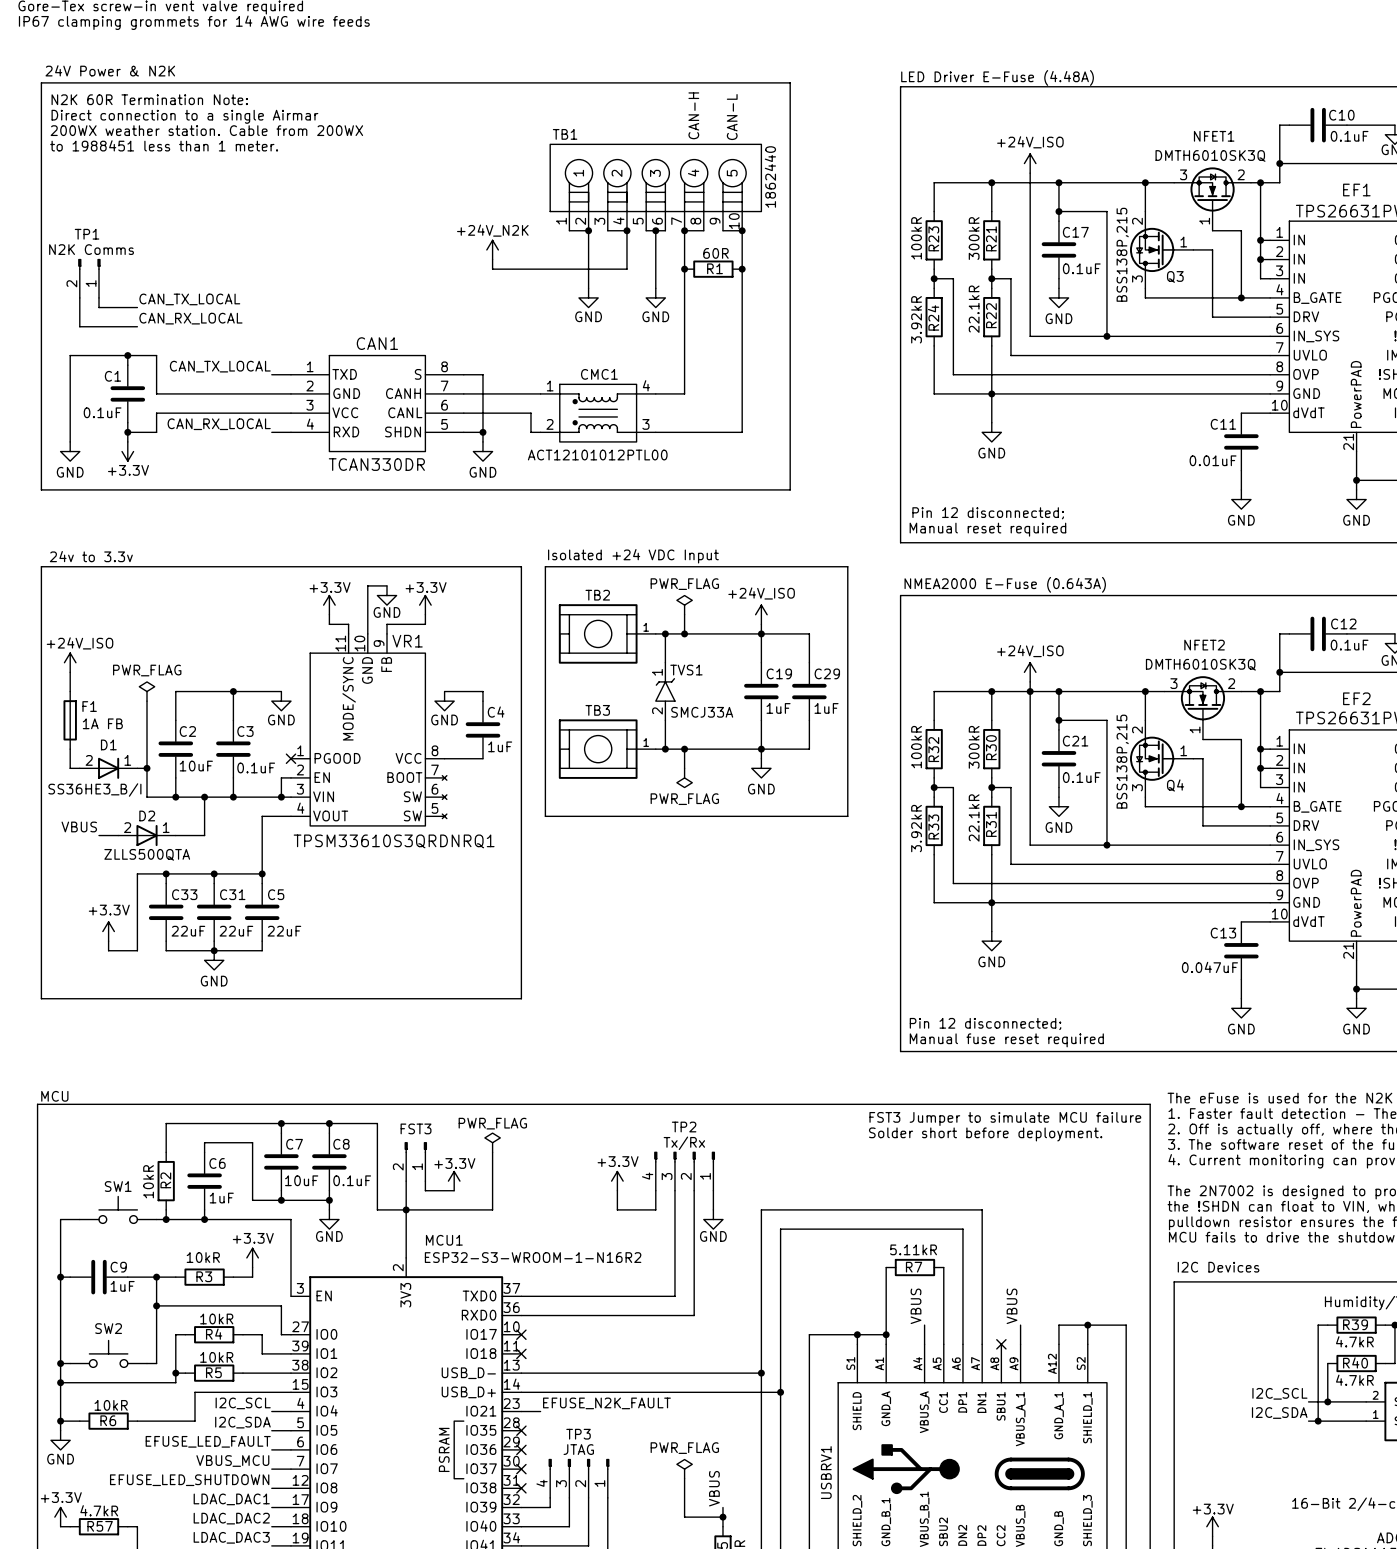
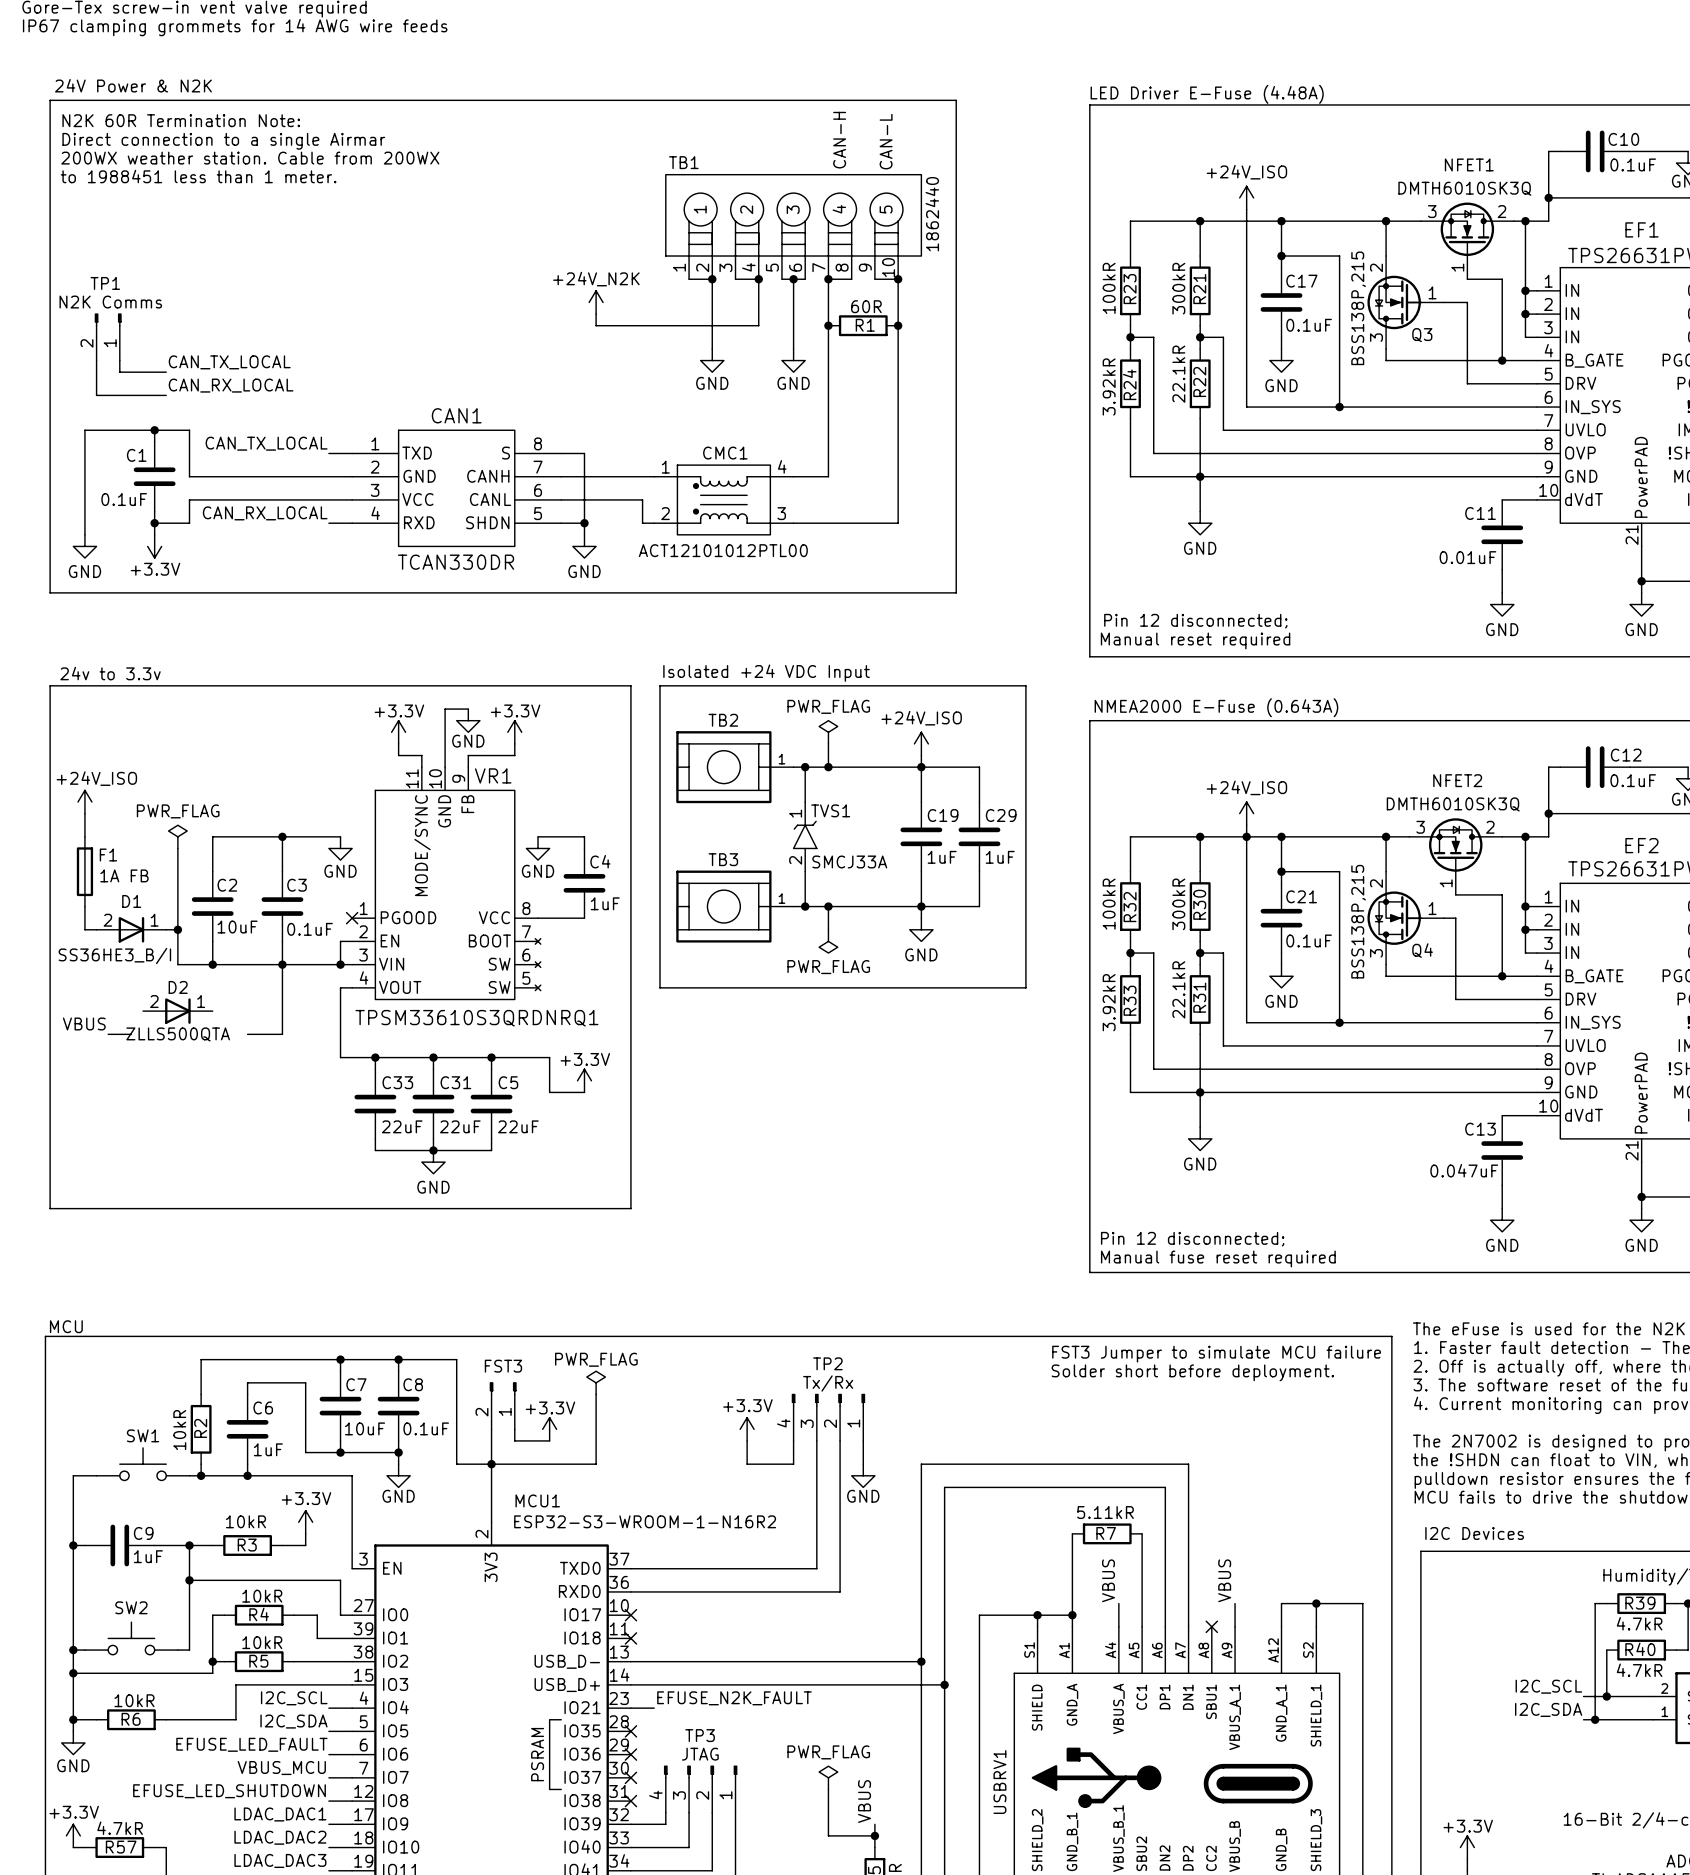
wire: (204, 797) (204, 835) (175, 835) -> none
junction: (204, 797) -> none
wire: none -> (282, 964) (282, 1034) (247, 1034)
wire: (281, 816) (262, 816) (262, 883) -> (340, 987) (340, 1057) (549, 1057) (549, 1092) (584, 1092)
label position: VBUS (79, 826) -> VBUS (84, 1023)
wire: (99, 835) (118, 835) -> (108, 1034) (131, 1034)
wire: (166, 873) (166, 883) -> (375, 1057) (375, 1069)
junction: (166, 873) -> none
wire: (214, 873) (214, 883) -> (433, 1057) (433, 1069)
junction: (214, 873) -> none
wire: (262, 873) (137, 873) (137, 950) (108, 950) (108, 941) -> none
junction: (262, 873) -> none
junction: none -> (375, 1057)
junction: none -> (433, 1057)
wire: none -> (491, 1057) (491, 1069)
junction: none -> (491, 1057)
power symbol: none -> +3.3V (584, 1080)
C33 position: (166, 912) -> (375, 1104)
C31 position: (214, 912) -> (433, 1104)
C5 position: (262, 912) -> (491, 1104)
power symbol: +3.3V (108, 931) -> none
wire: (166, 941) (166, 950) (262, 950) (262, 941) -> (375, 1138) (375, 1150) (491, 1150) (491, 1138)
wire: (214, 941) (214, 950) -> (433, 1138) (433, 1150)
junction: (214, 950) -> none
junction: none -> (433, 1150)
power symbol position: GND (214, 960) -> GND (433, 1162)

